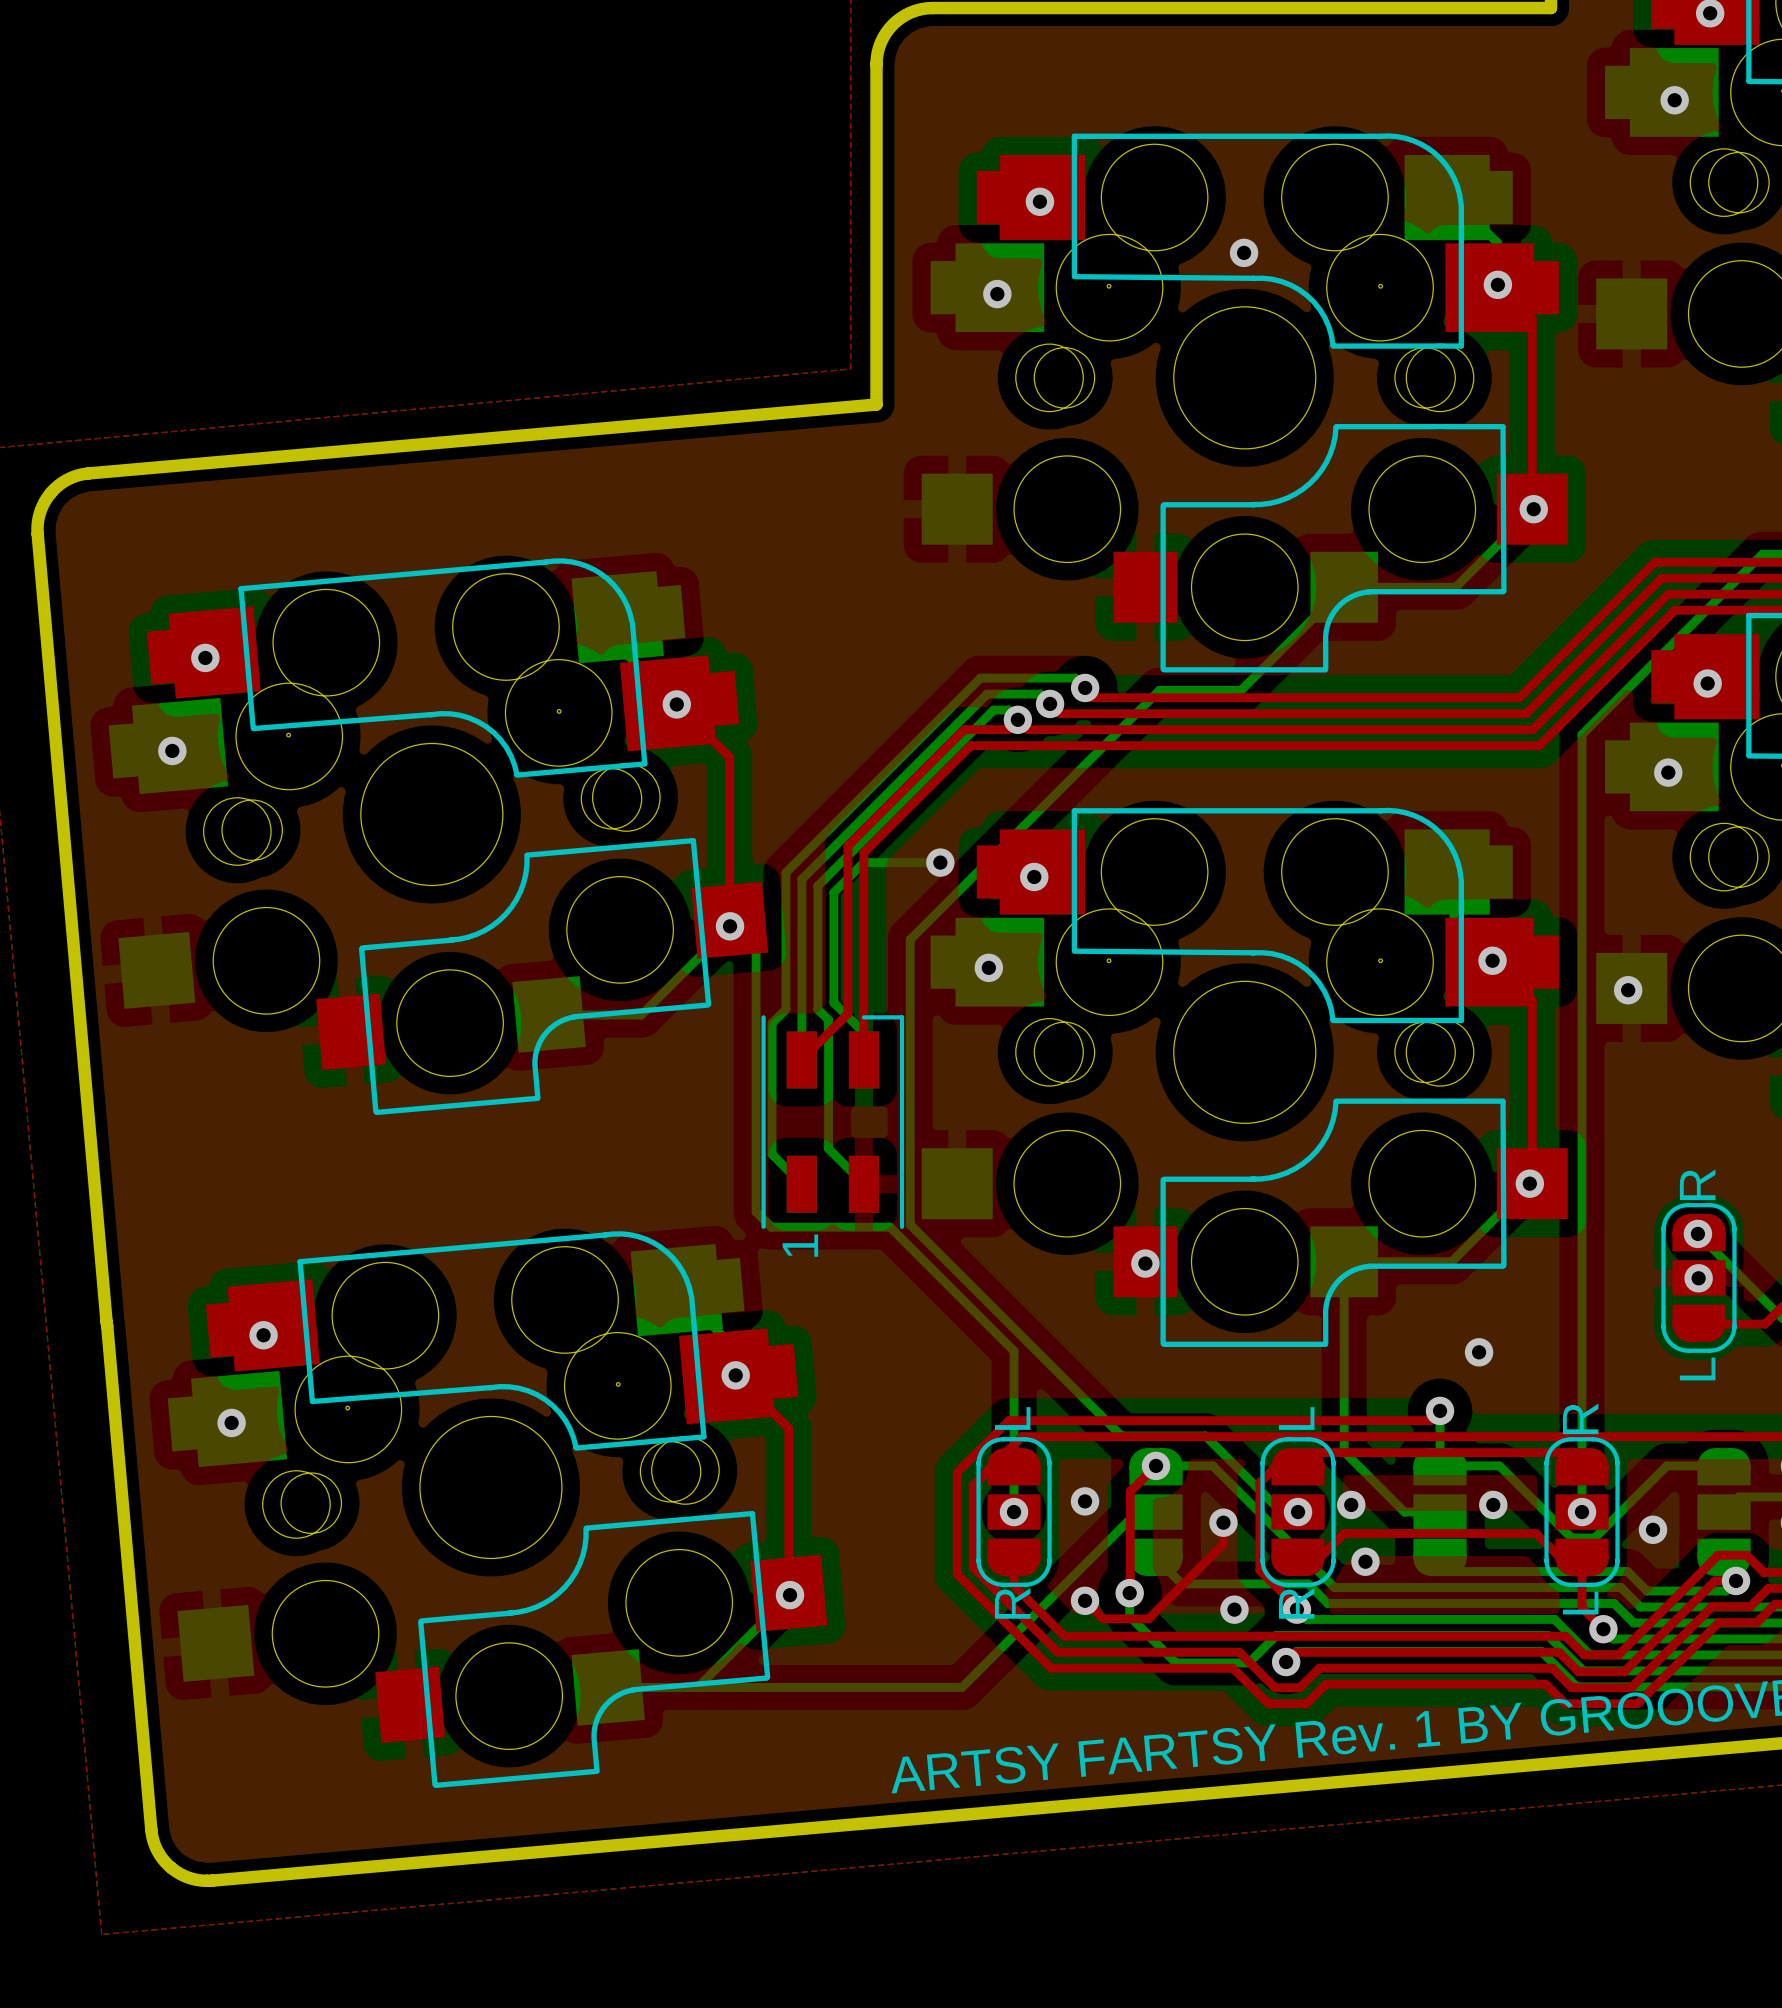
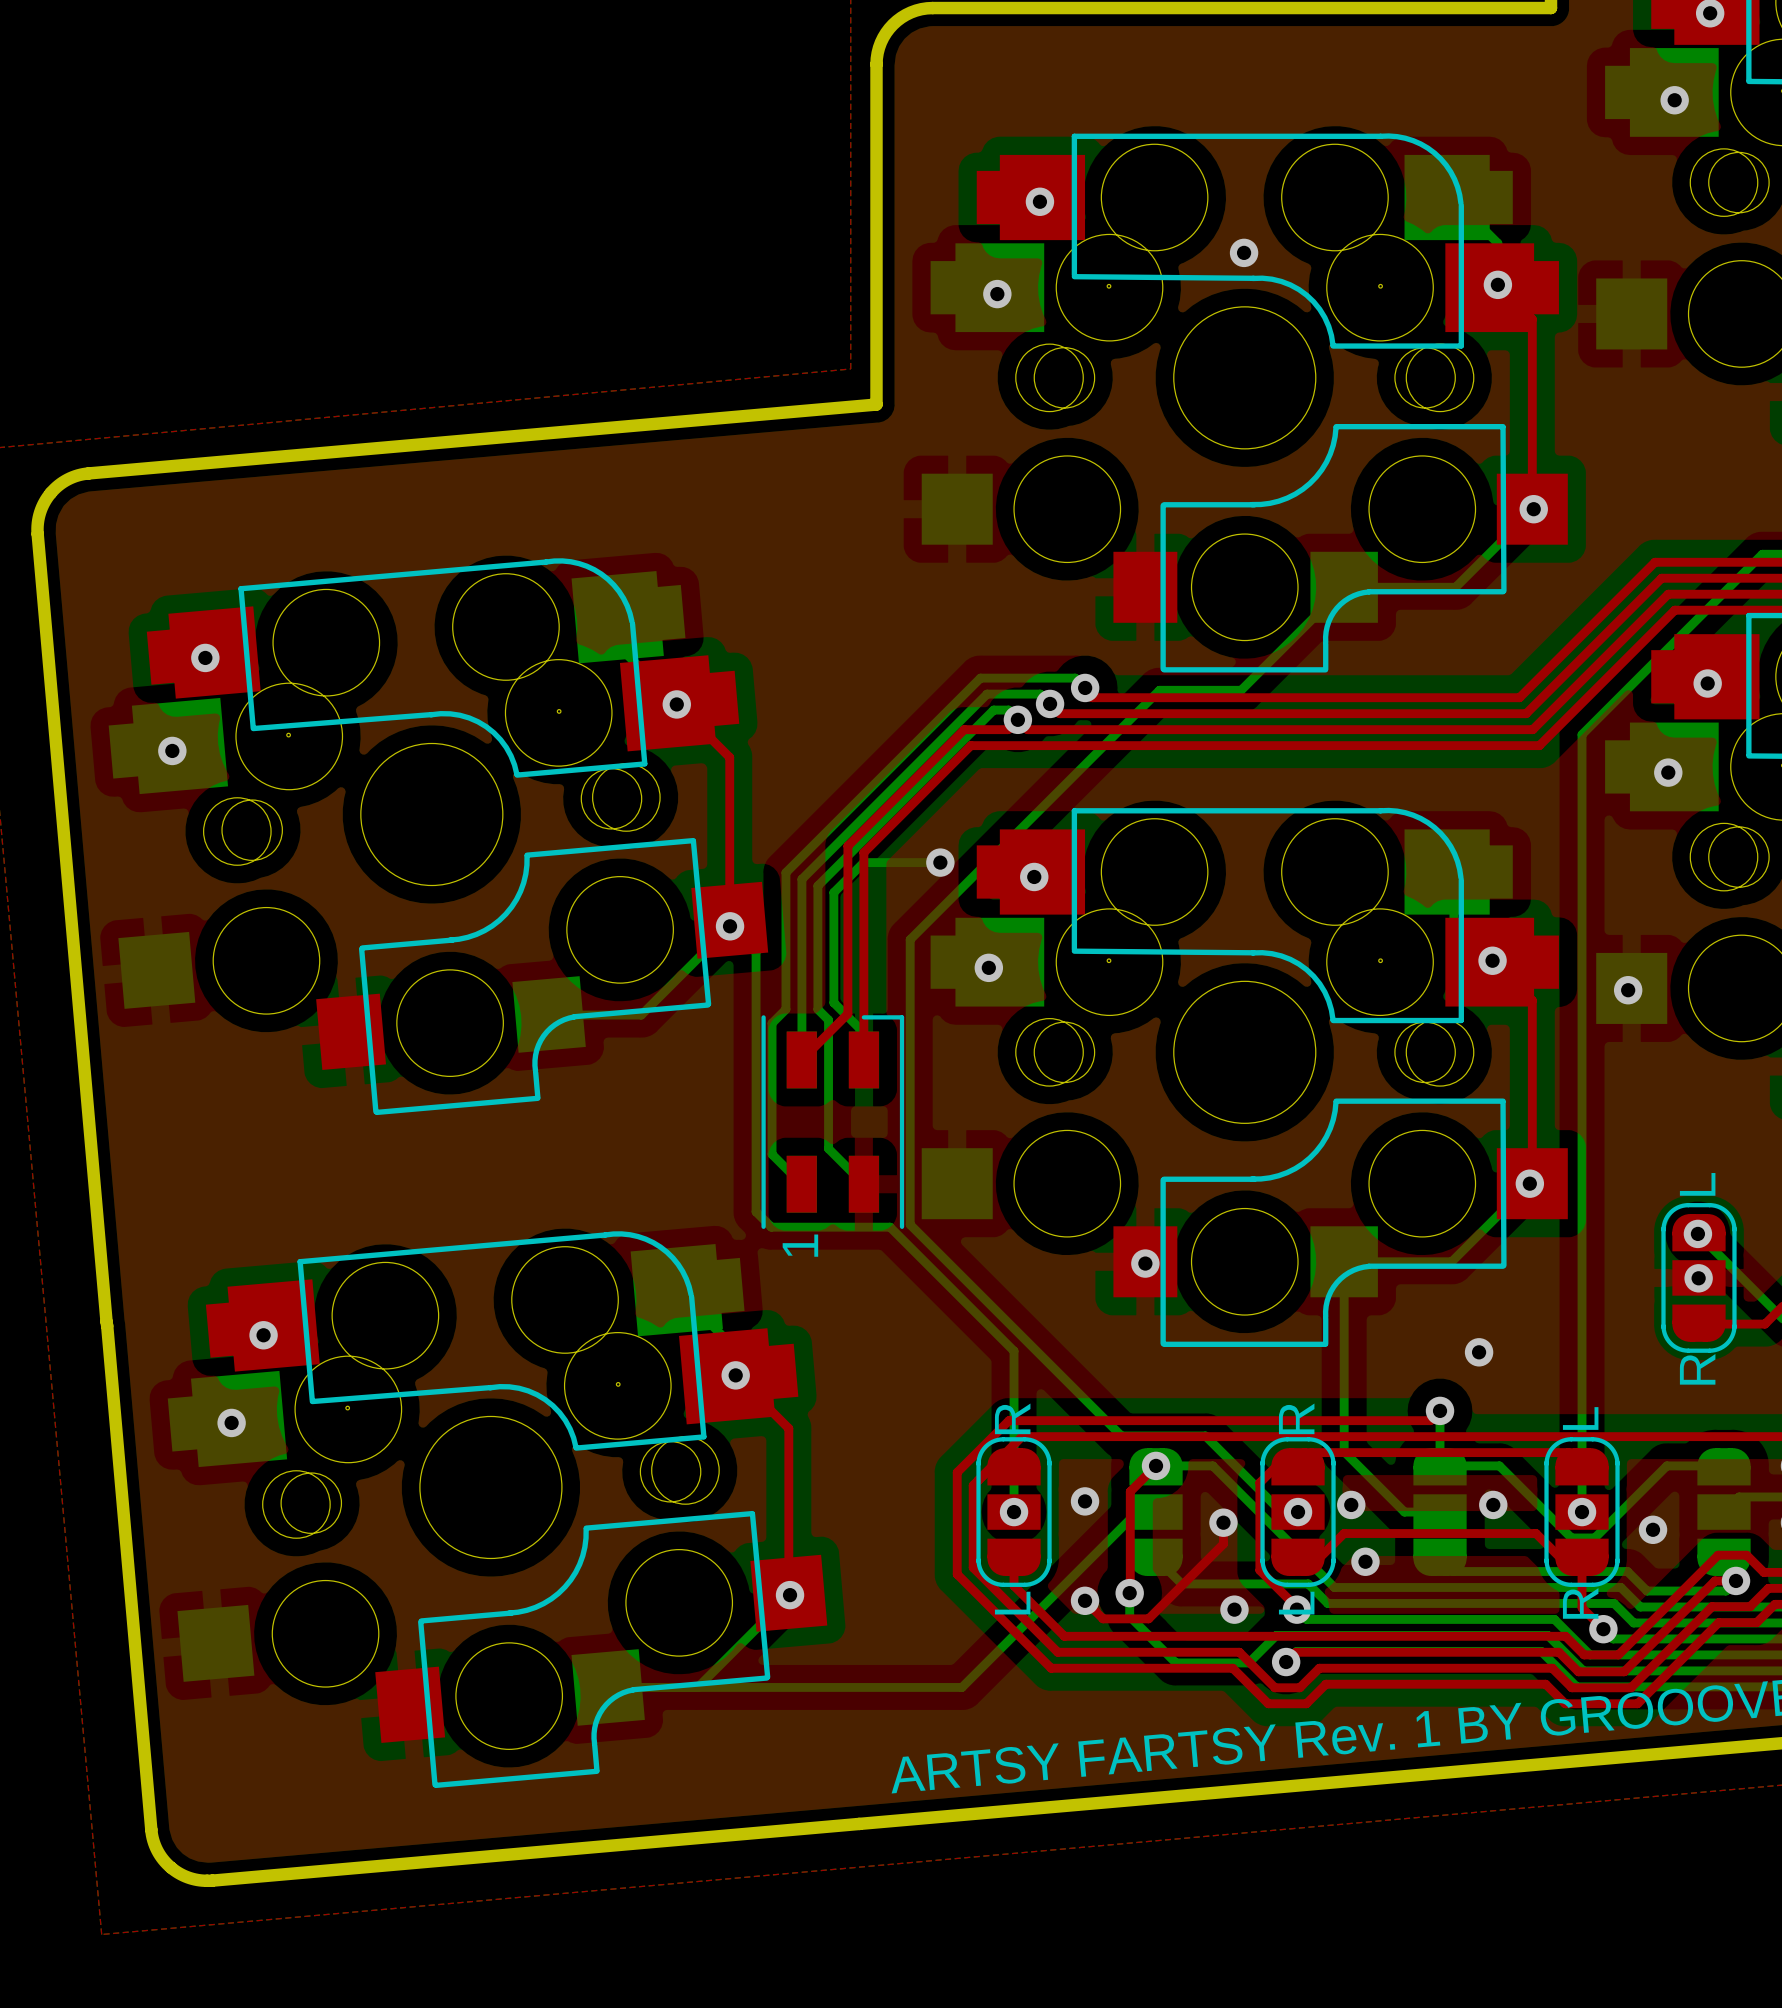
part rotation: 0° (1698, 1277) -> 180° (1698, 1277)
part rotation: 0° (1014, 1512) -> 180° (1014, 1512)
part rotation: 0° (1298, 1512) -> 180° (1298, 1512)
part rotation: 0° (1582, 1512) -> 180° (1582, 1512)

